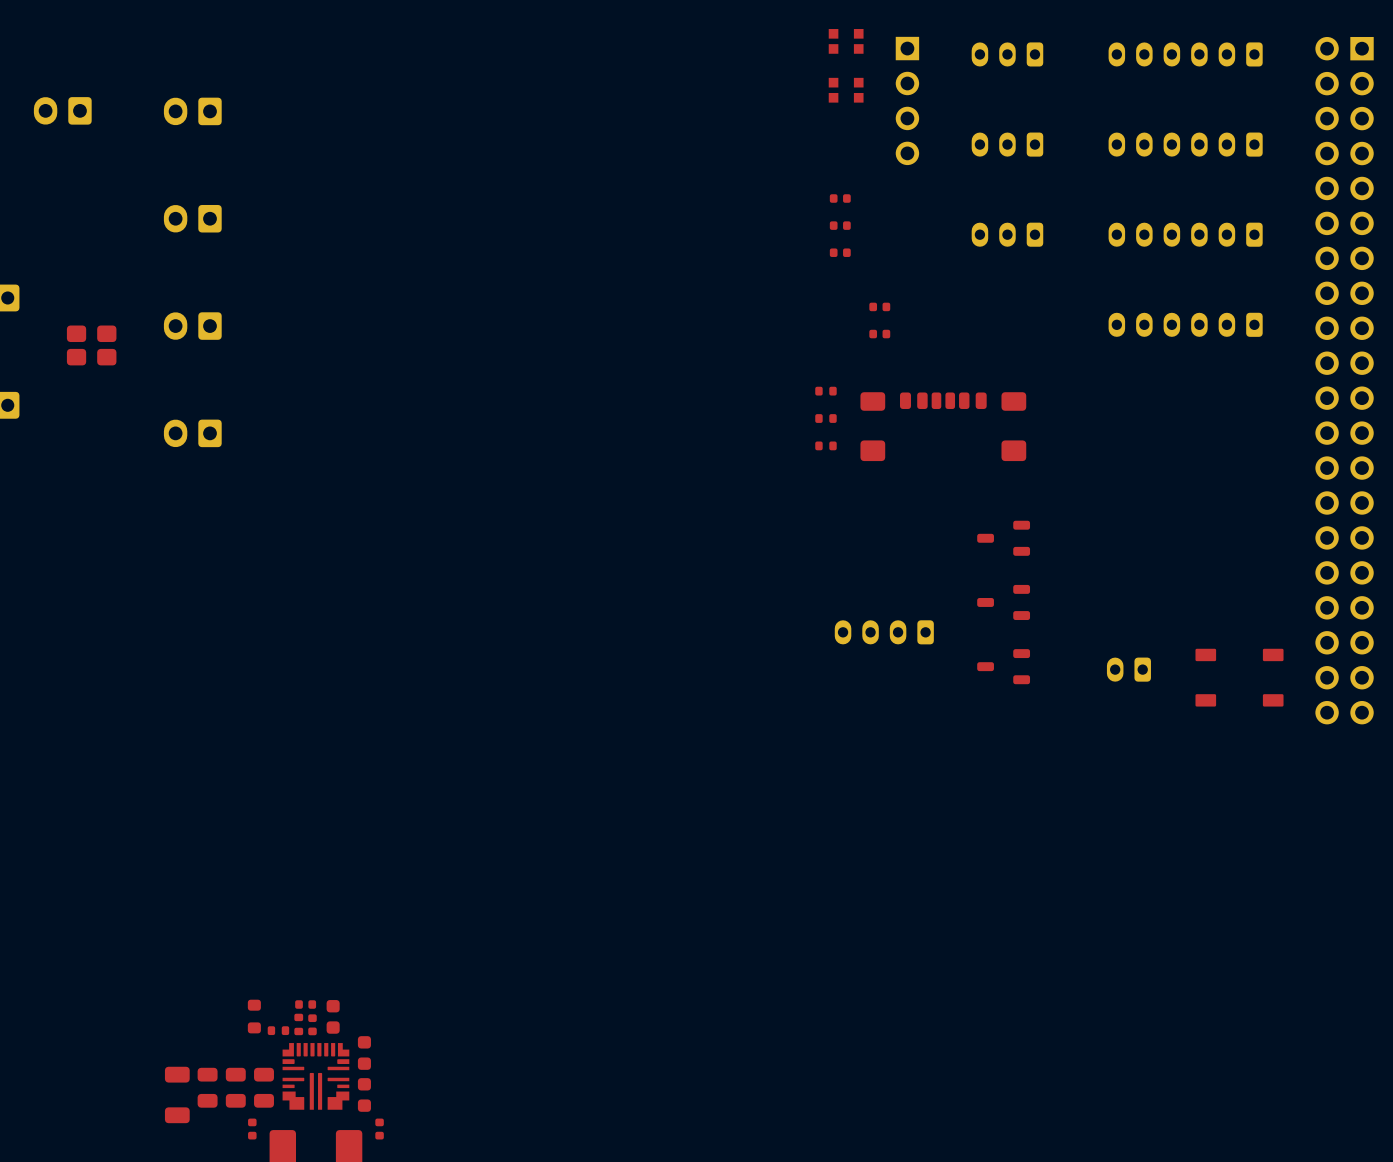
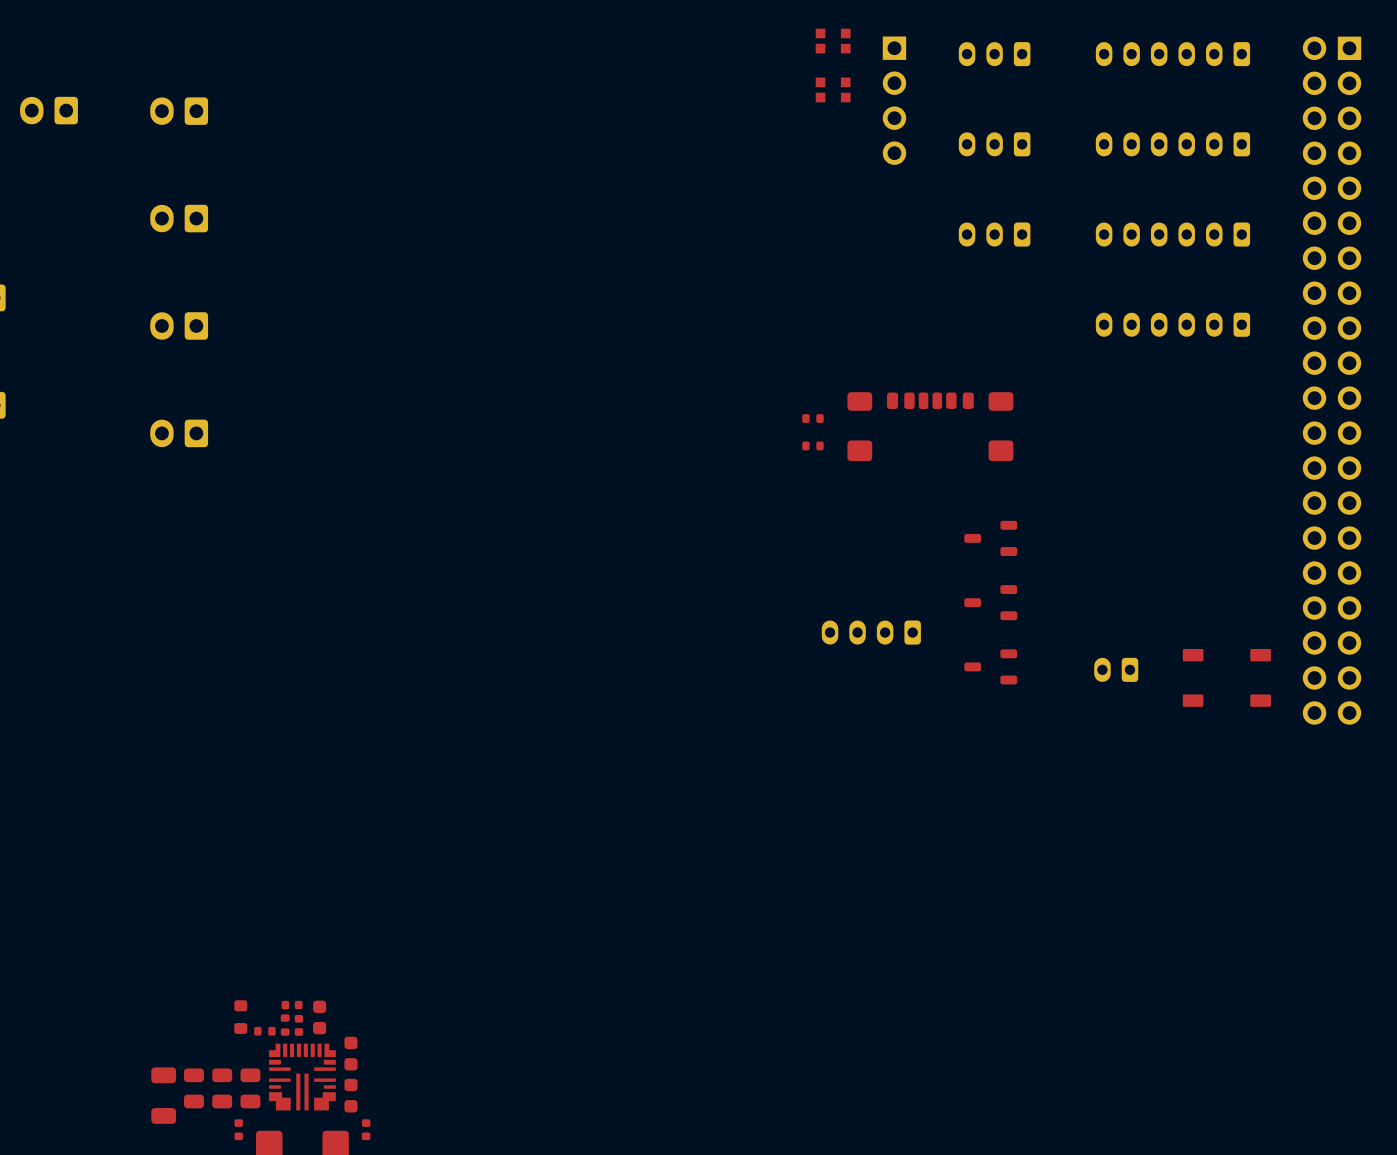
part: (840, 198) -> none
part: (840, 225) -> none
part: (840, 252) -> none
part: (879, 306) -> none
part: (879, 334) -> none
part: (91, 345) -> none
part: (825, 391) -> none

